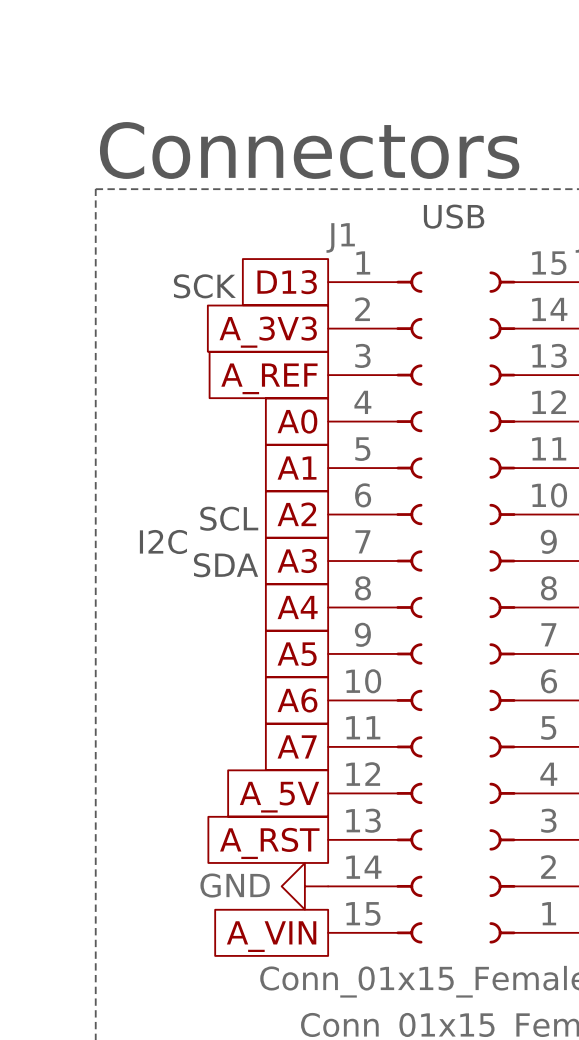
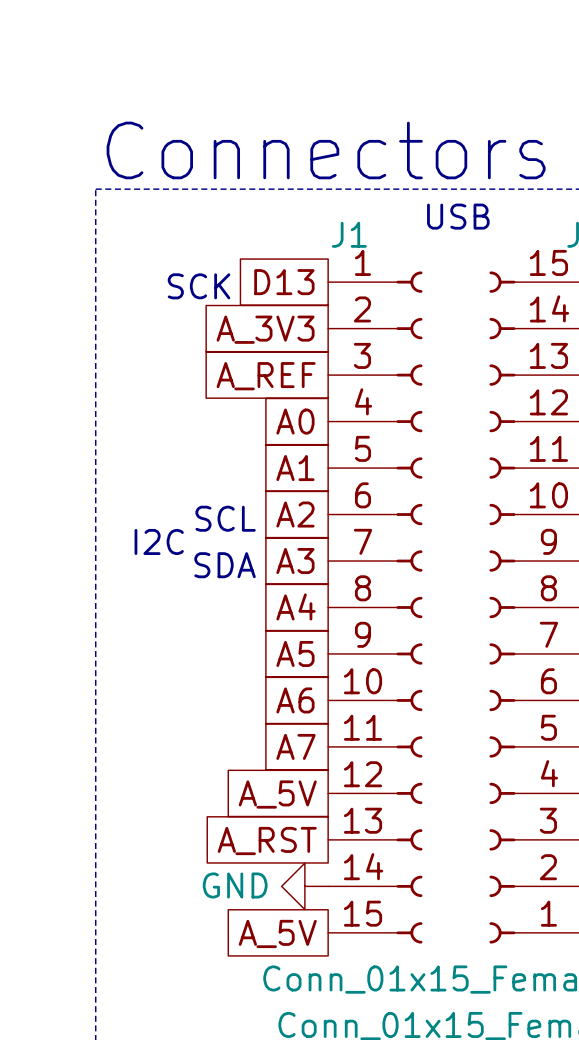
global label: A_VIN (271, 936) -> A_5V (277, 933)

